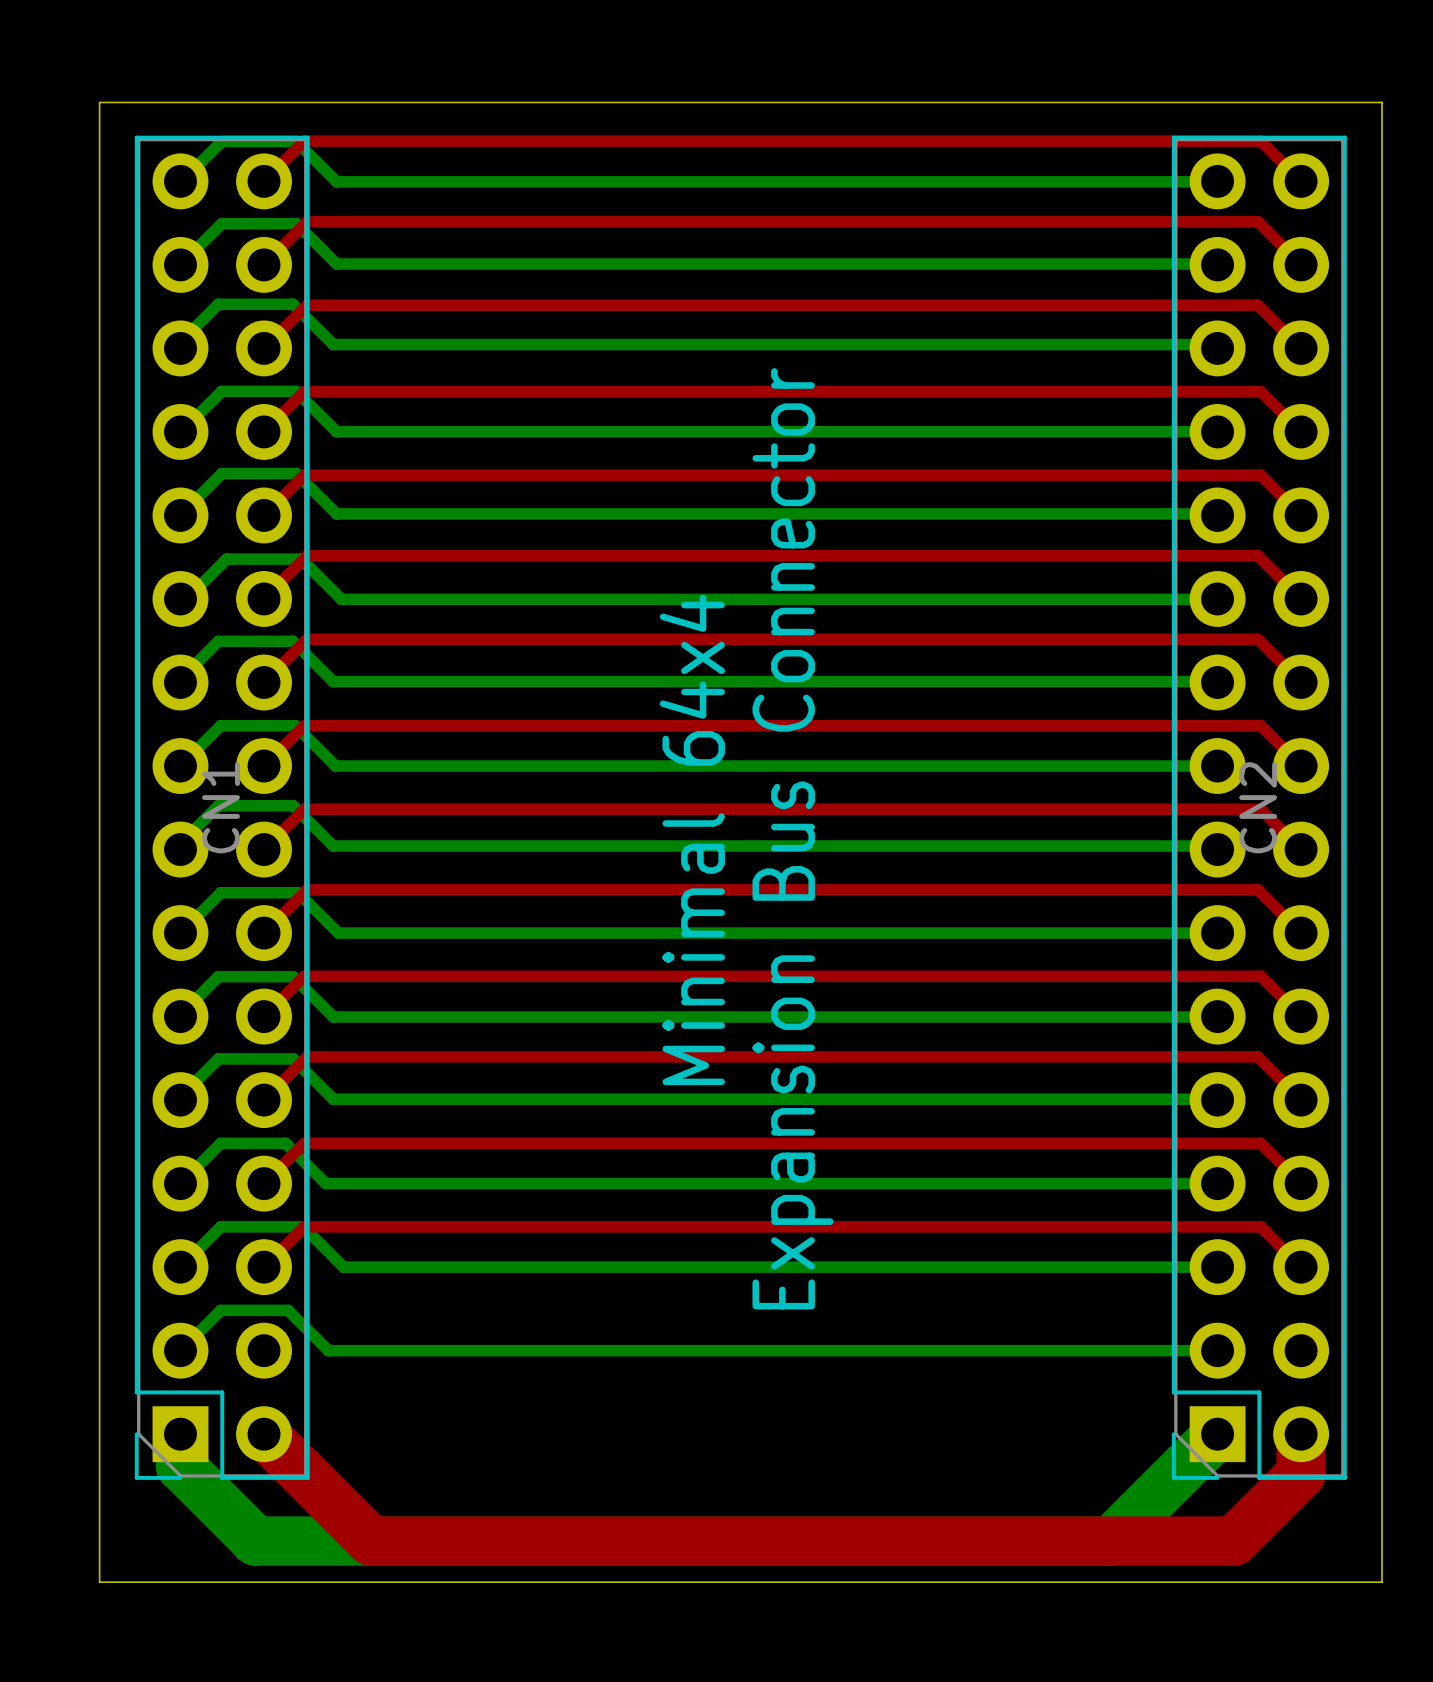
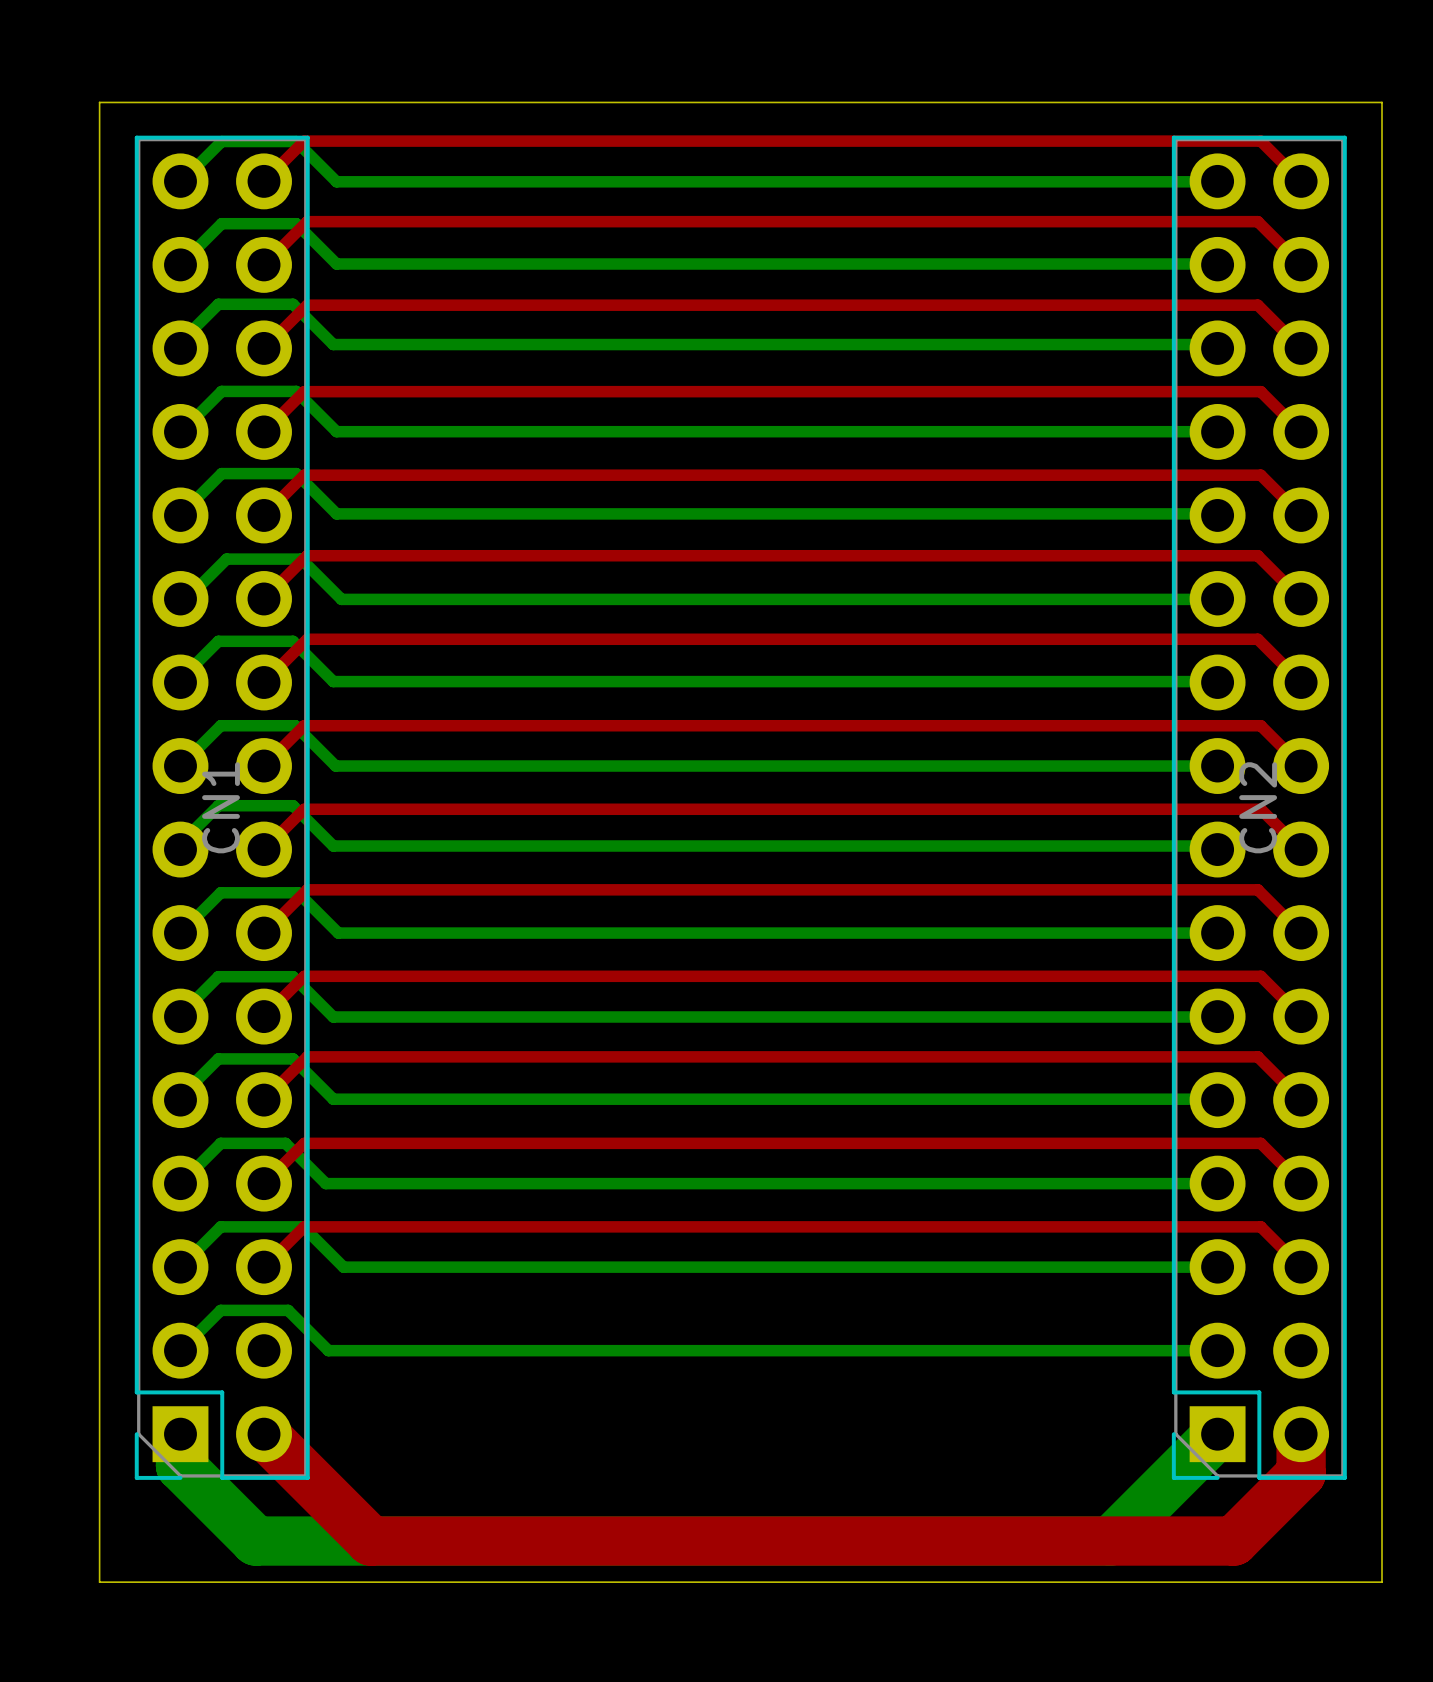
text: Expansion Bus Connector (793, 838) -> none
text: Minimal 64x4 (692, 839) -> none

